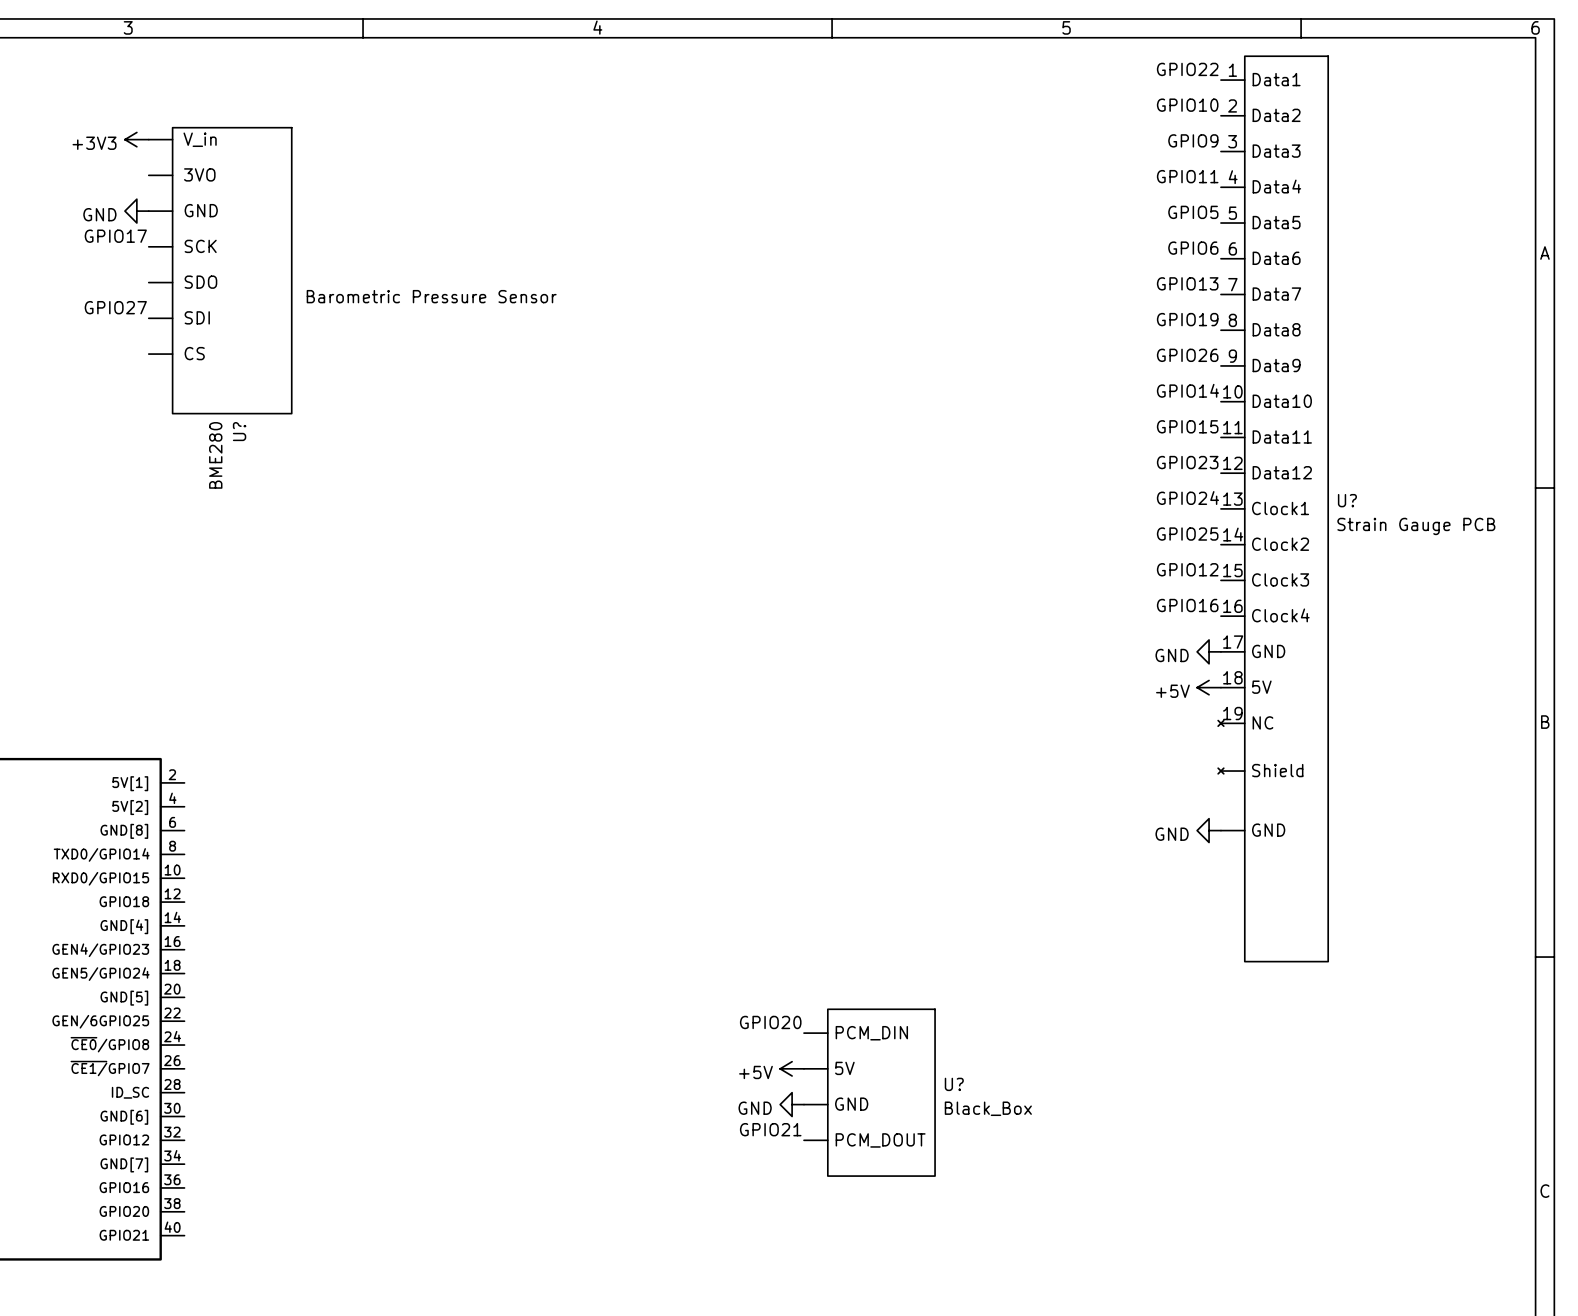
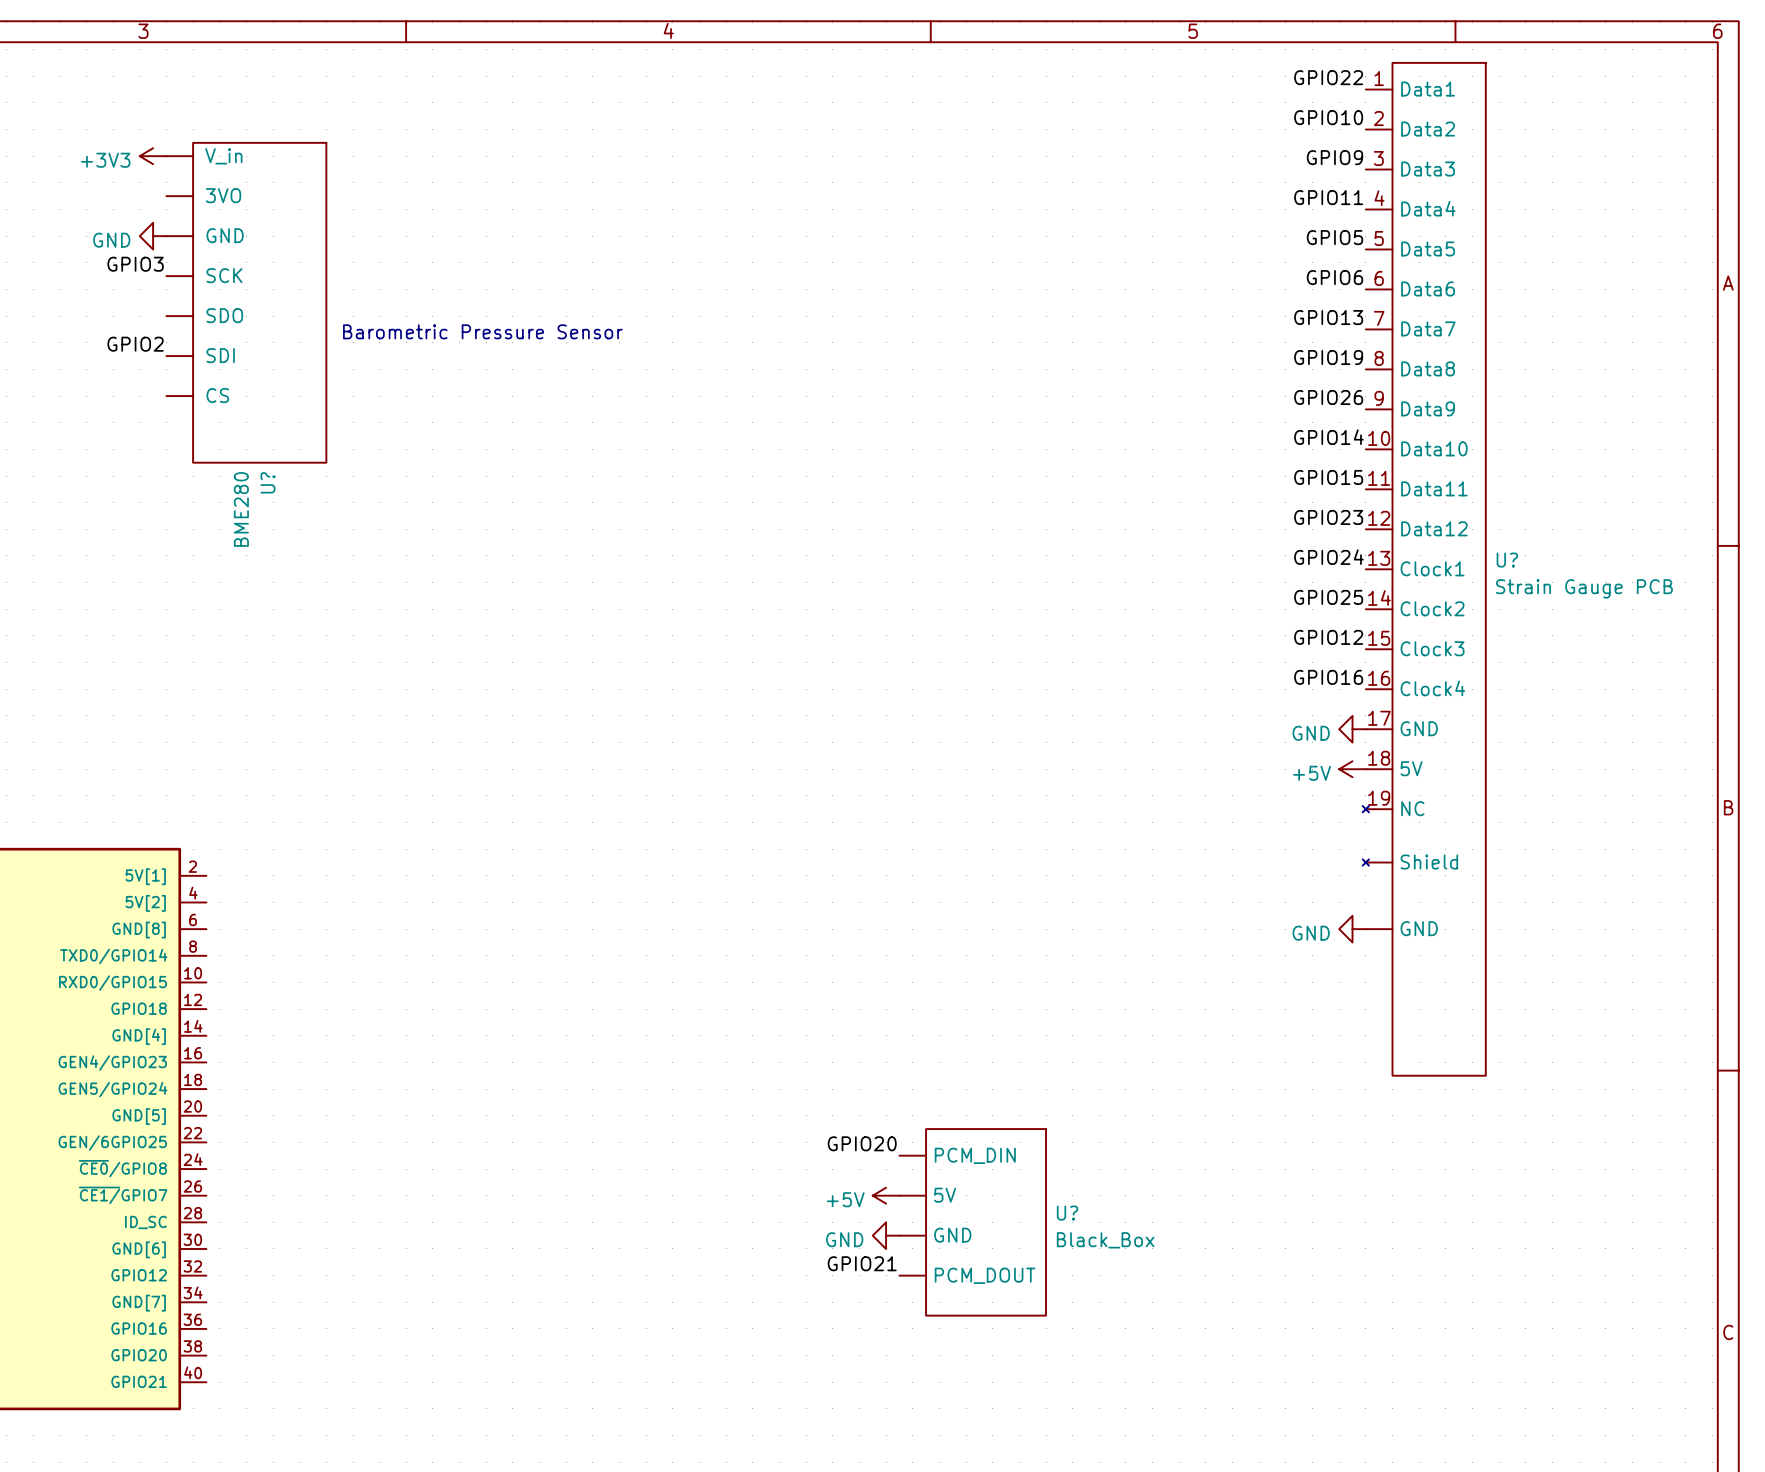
label: GPIO17 (115, 236) -> GPIO3 (135, 264)
label: GPIO27 (115, 307) -> GPIO2 (135, 344)

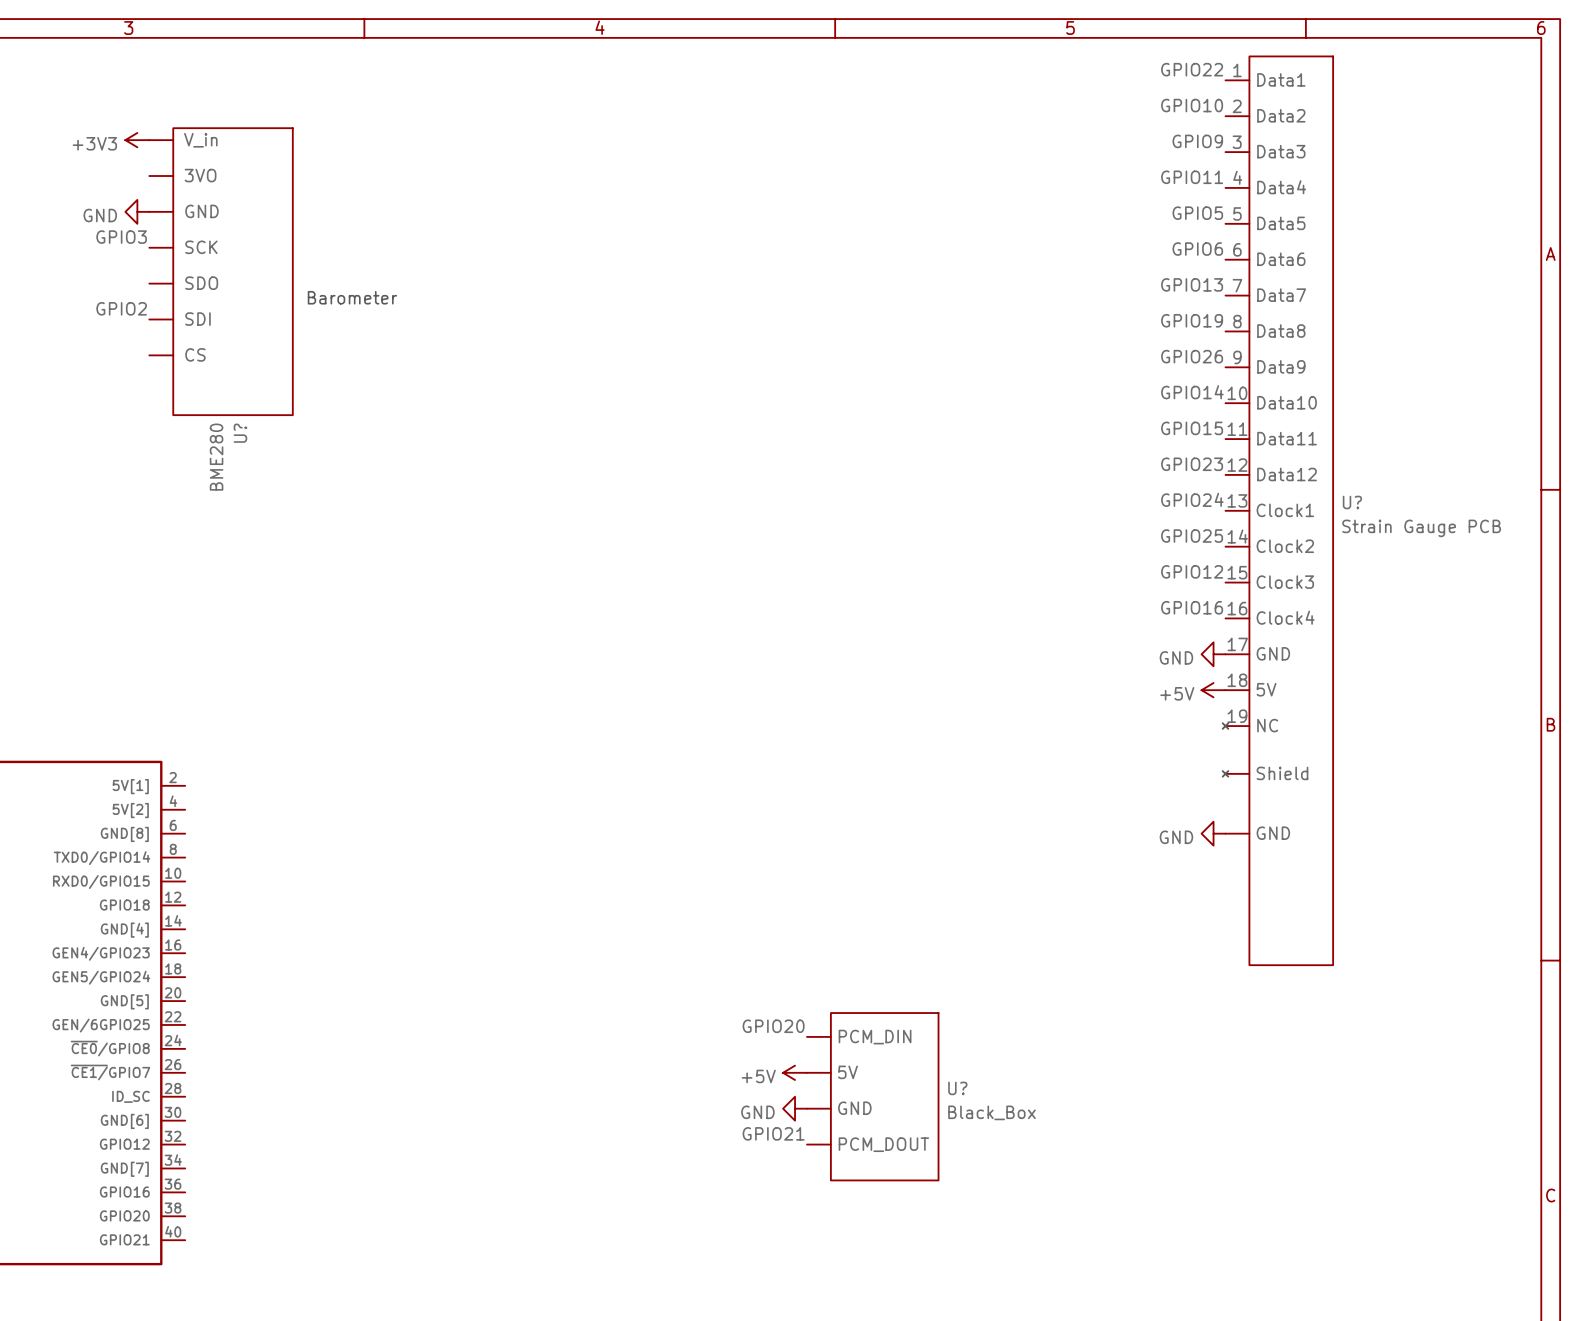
text: Barometric Pressure Sensor (482, 331) -> Barometer (352, 297)

